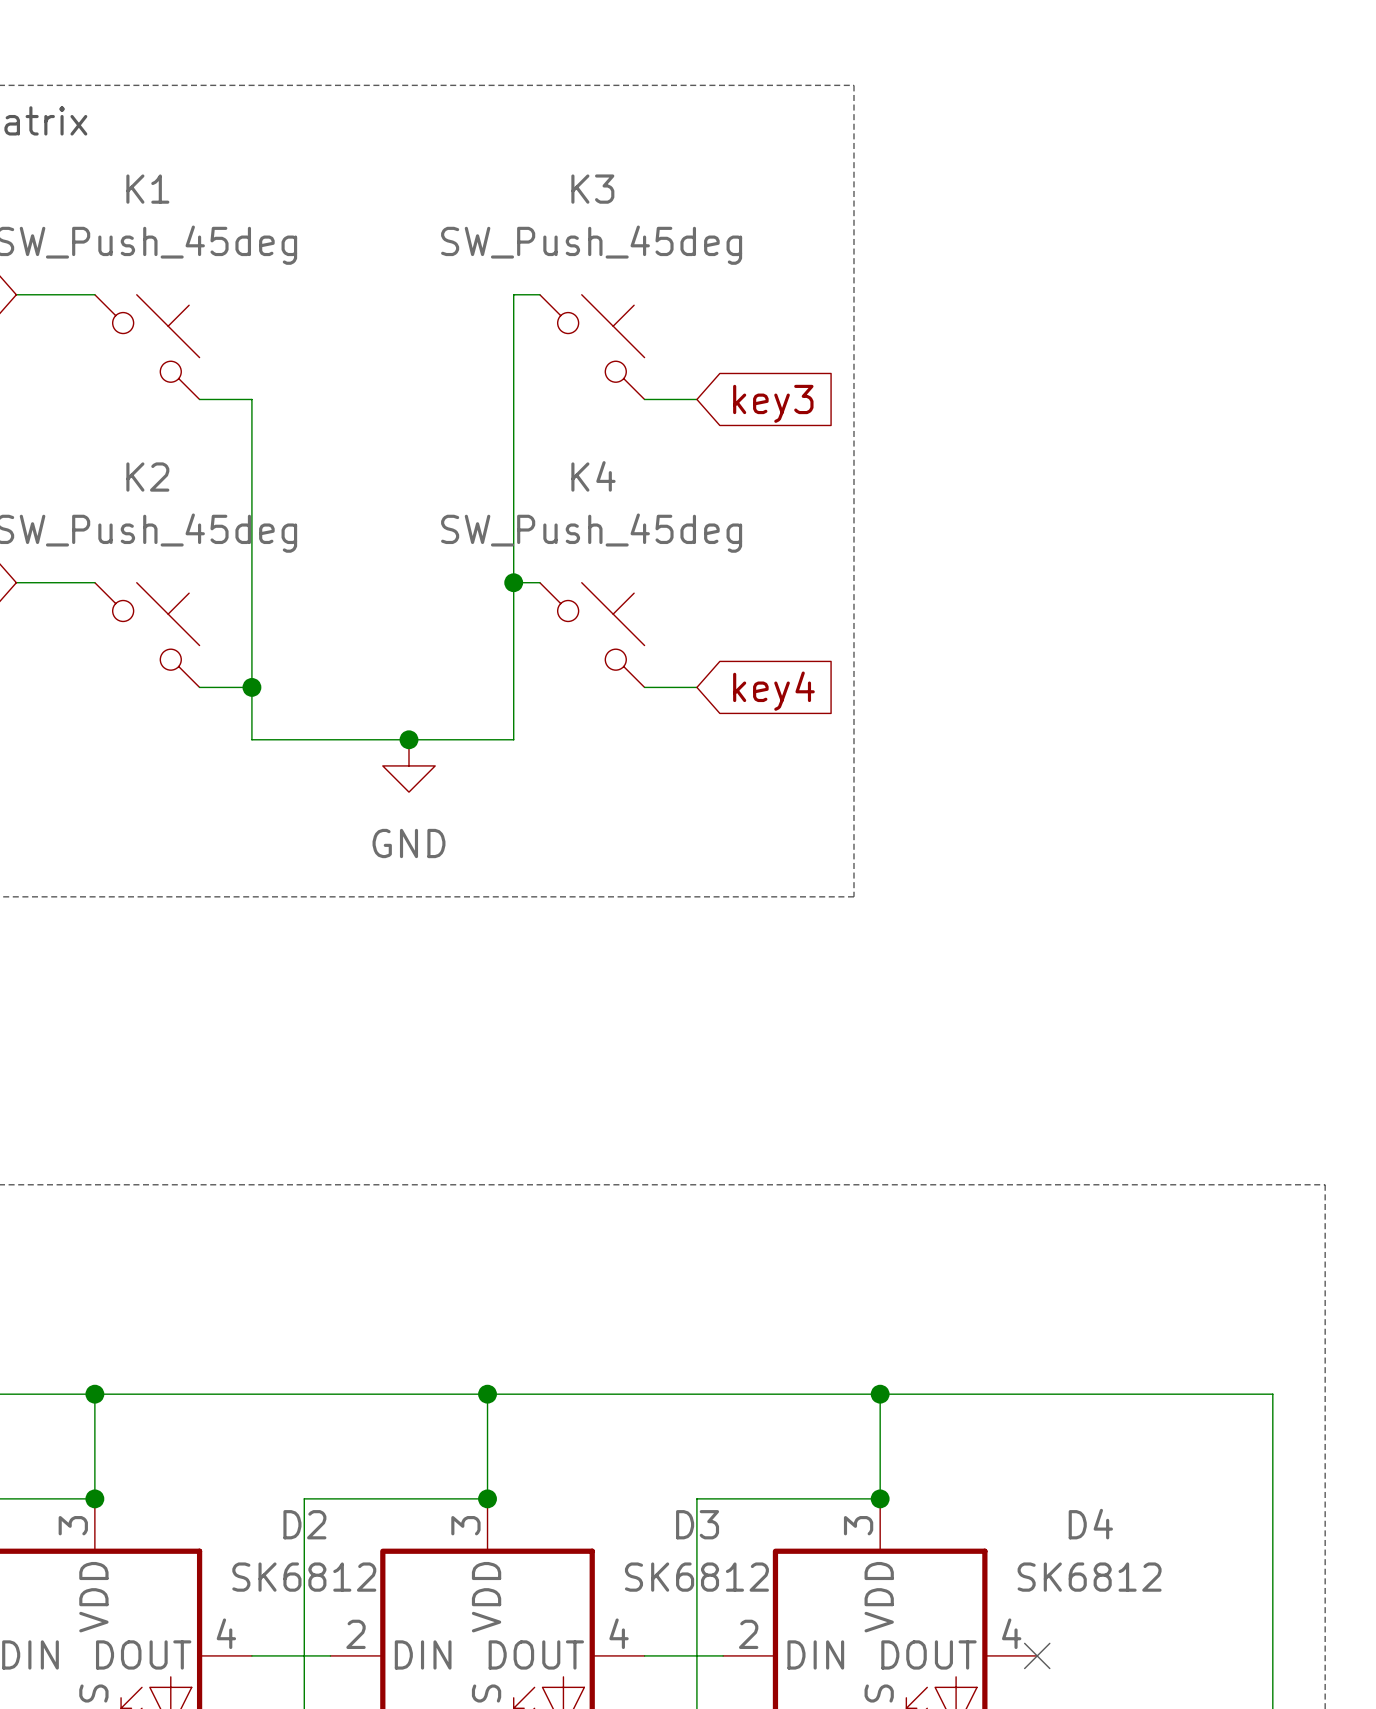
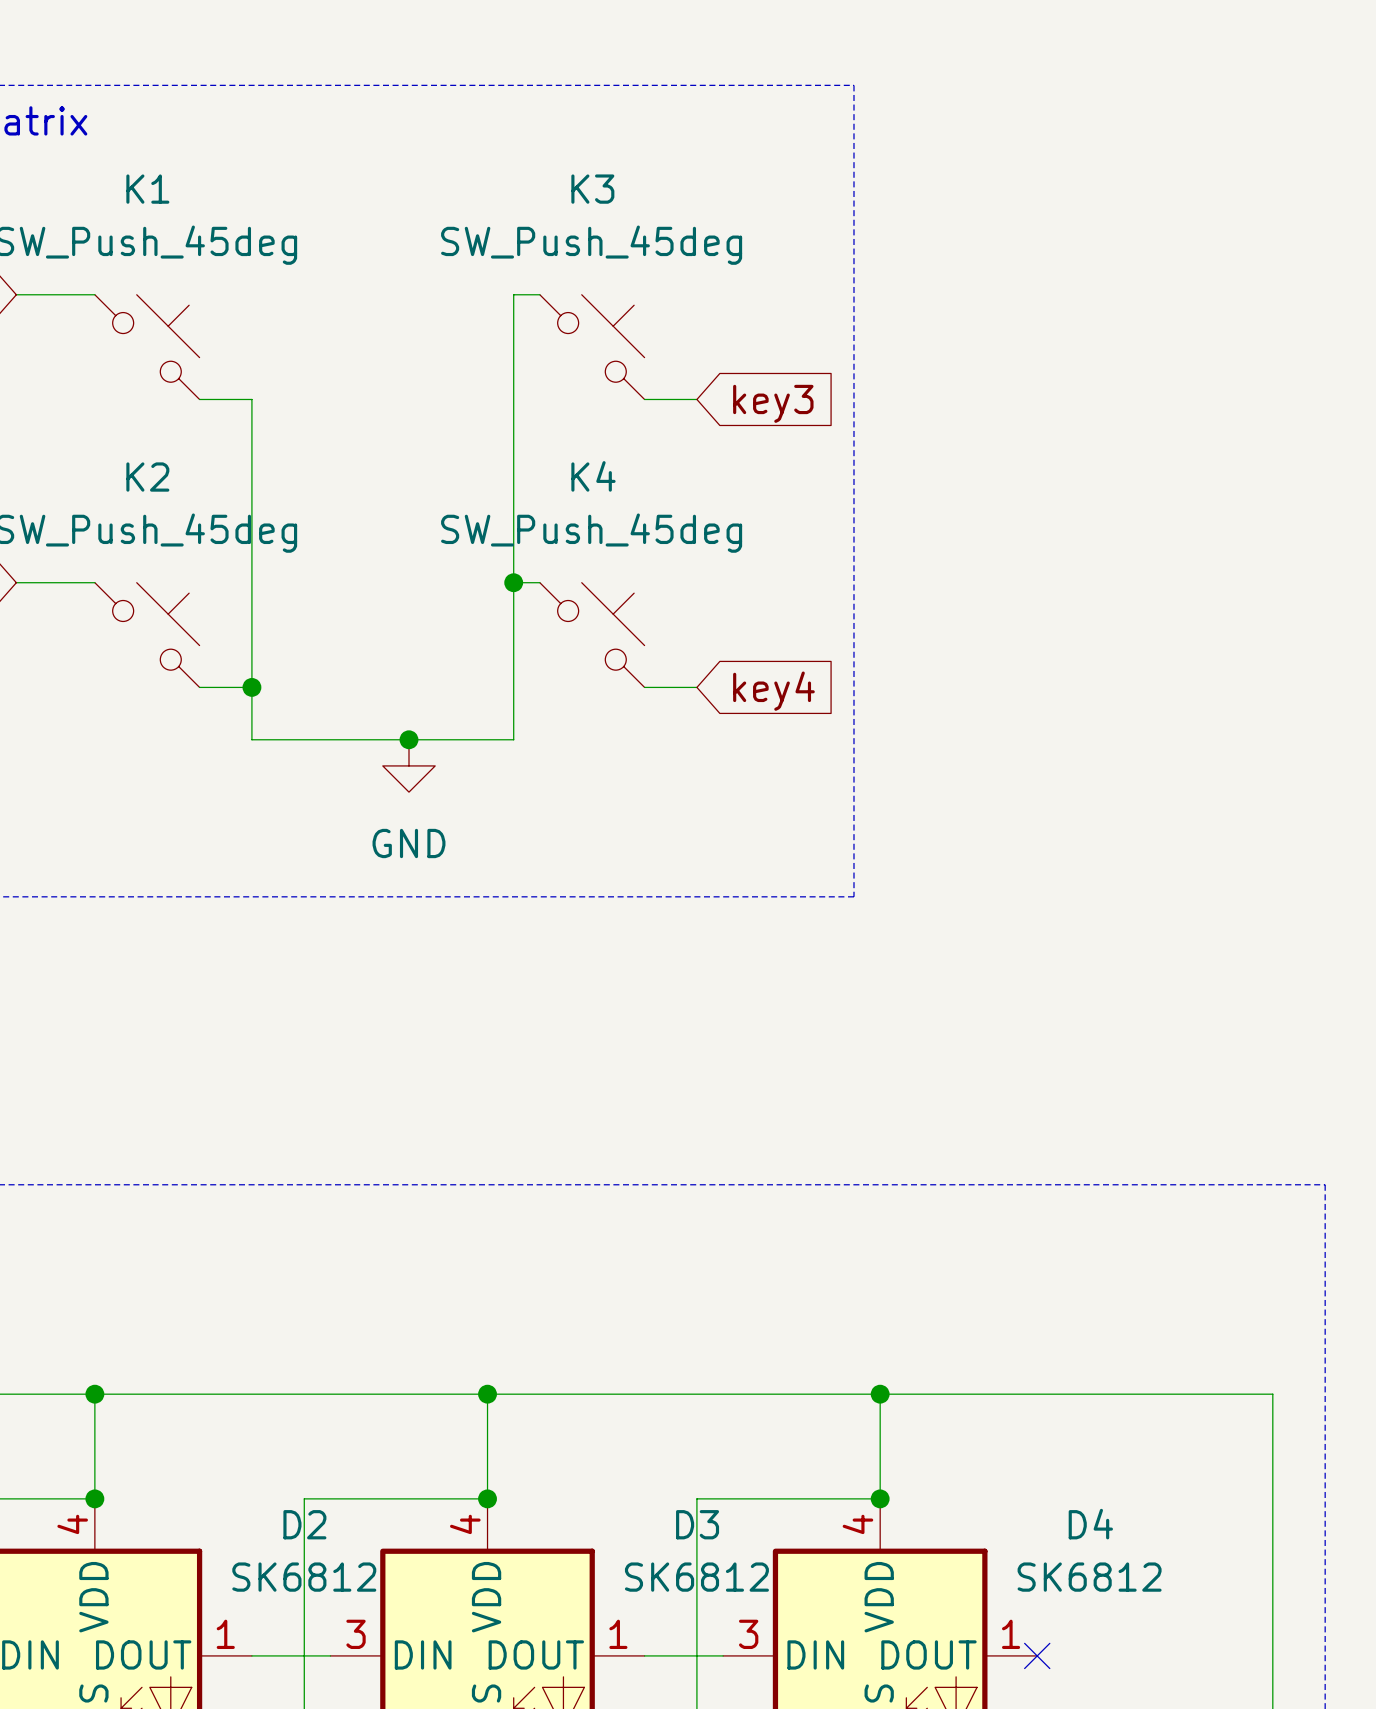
D2 pin number: 3 (73, 1525) -> 4 (72, 1524)
D3 pin number: 3 (465, 1525) -> 4 (465, 1524)
D4 pin number: 3 (858, 1525) -> 4 (857, 1524)
D2 pin number: 4 (226, 1633) -> 1 (225, 1634)
D3 pin number: 4 (619, 1633) -> 1 (618, 1634)
D4 pin number: 4 (1011, 1633) -> 1 (1011, 1634)
D3 pin number: 2 (356, 1634) -> 3 (356, 1634)
D4 pin number: 2 (748, 1634) -> 3 (748, 1634)

